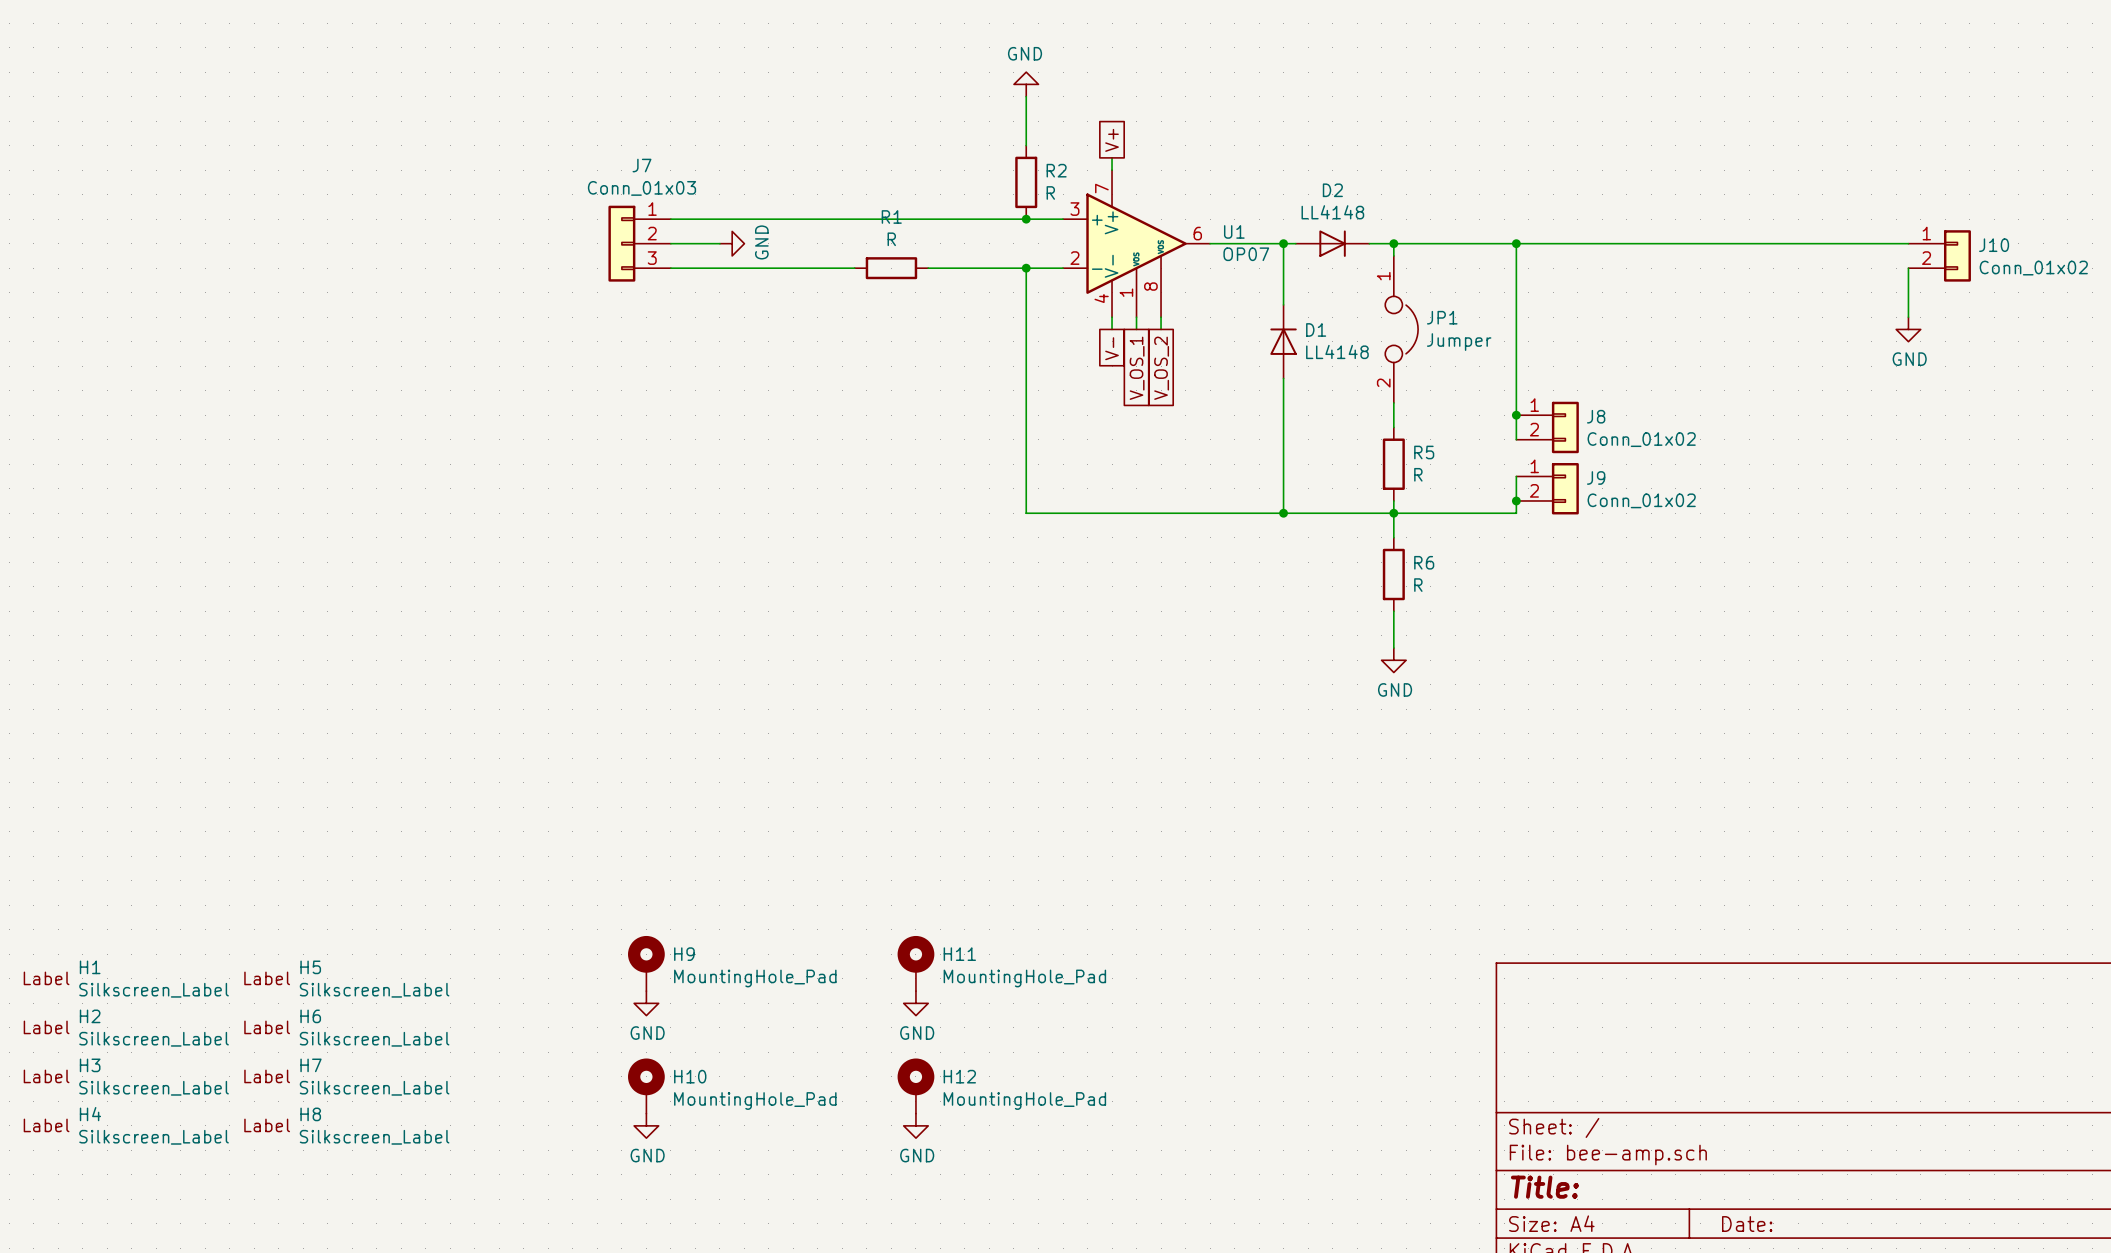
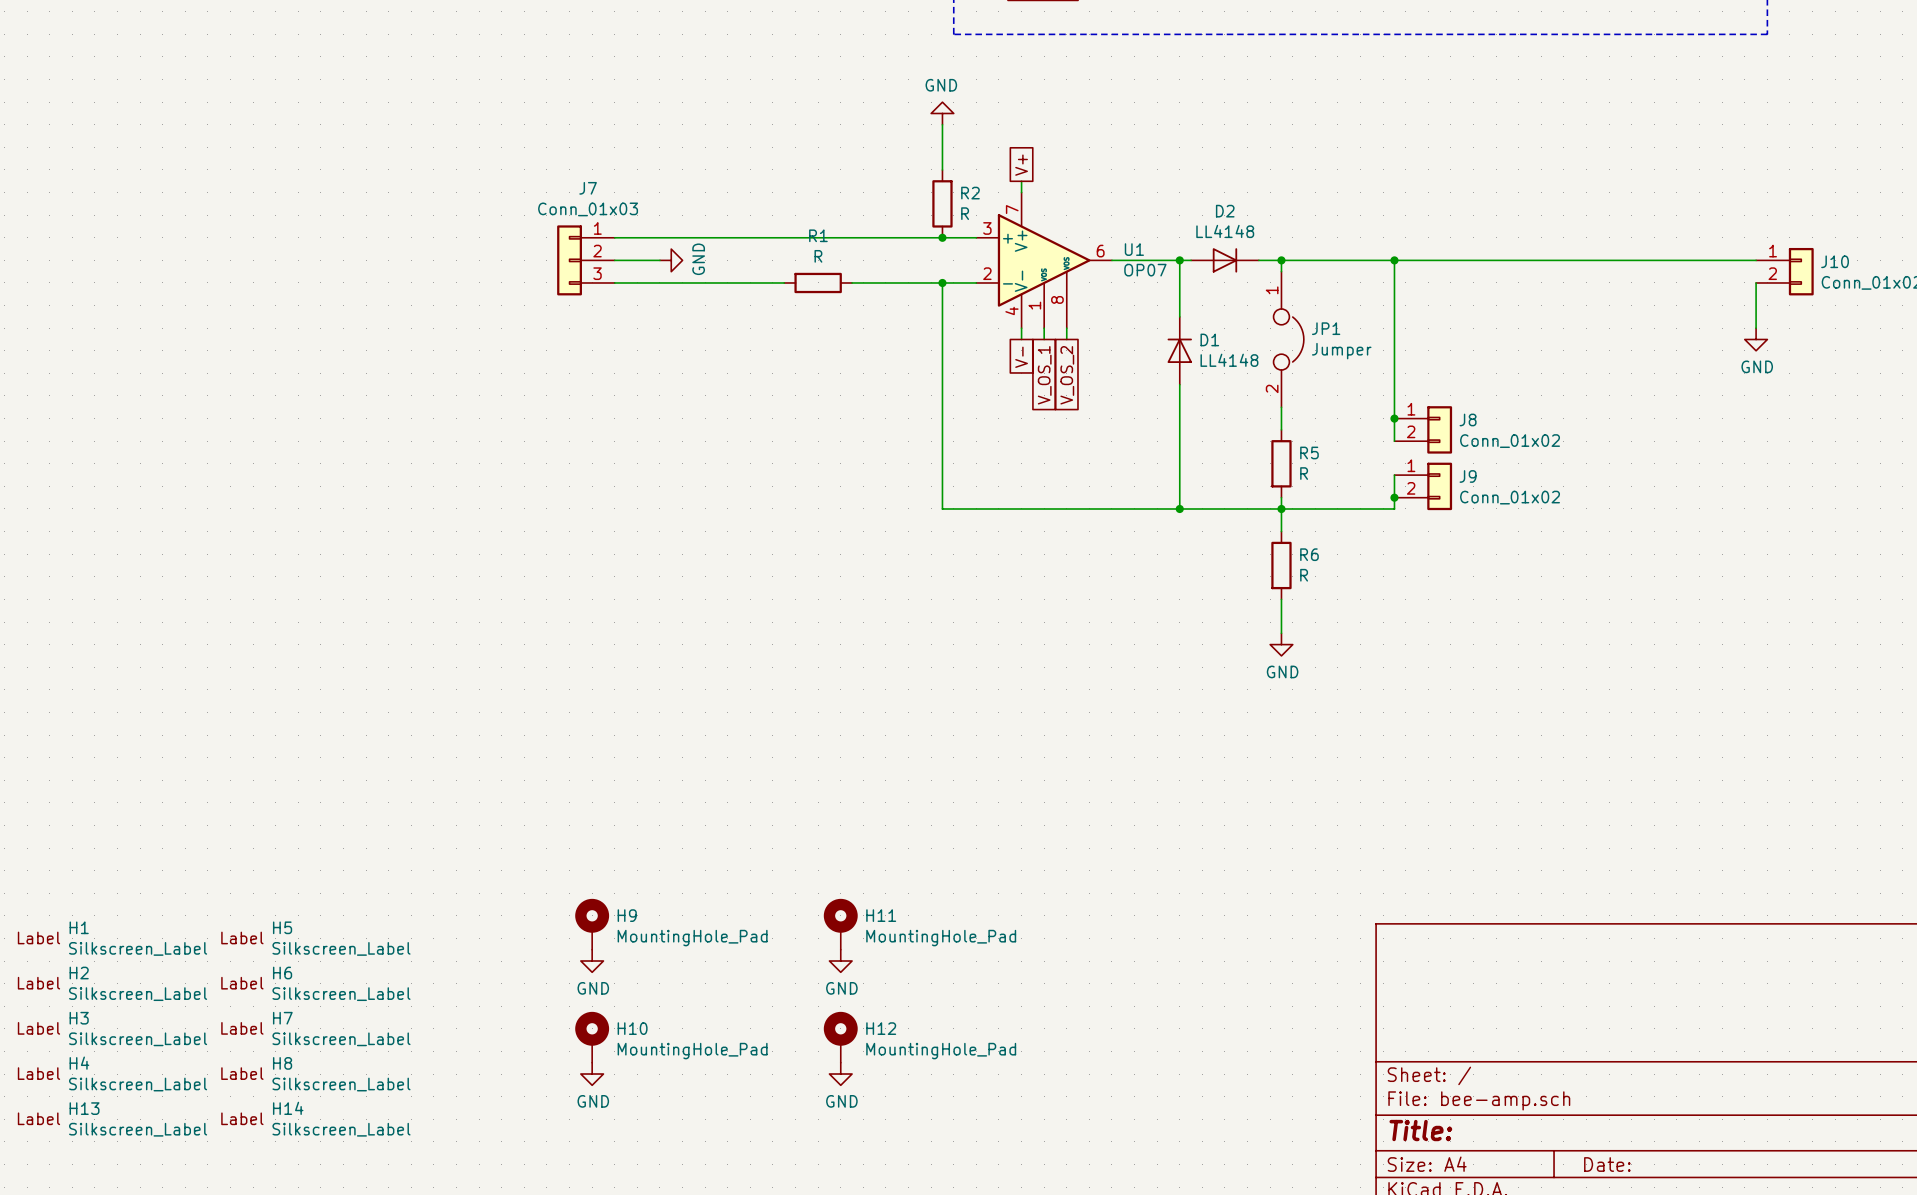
H14: none -> Silkscreen_Label (315, 1119)
H13: none -> Silkscreen_Label (112, 1119)

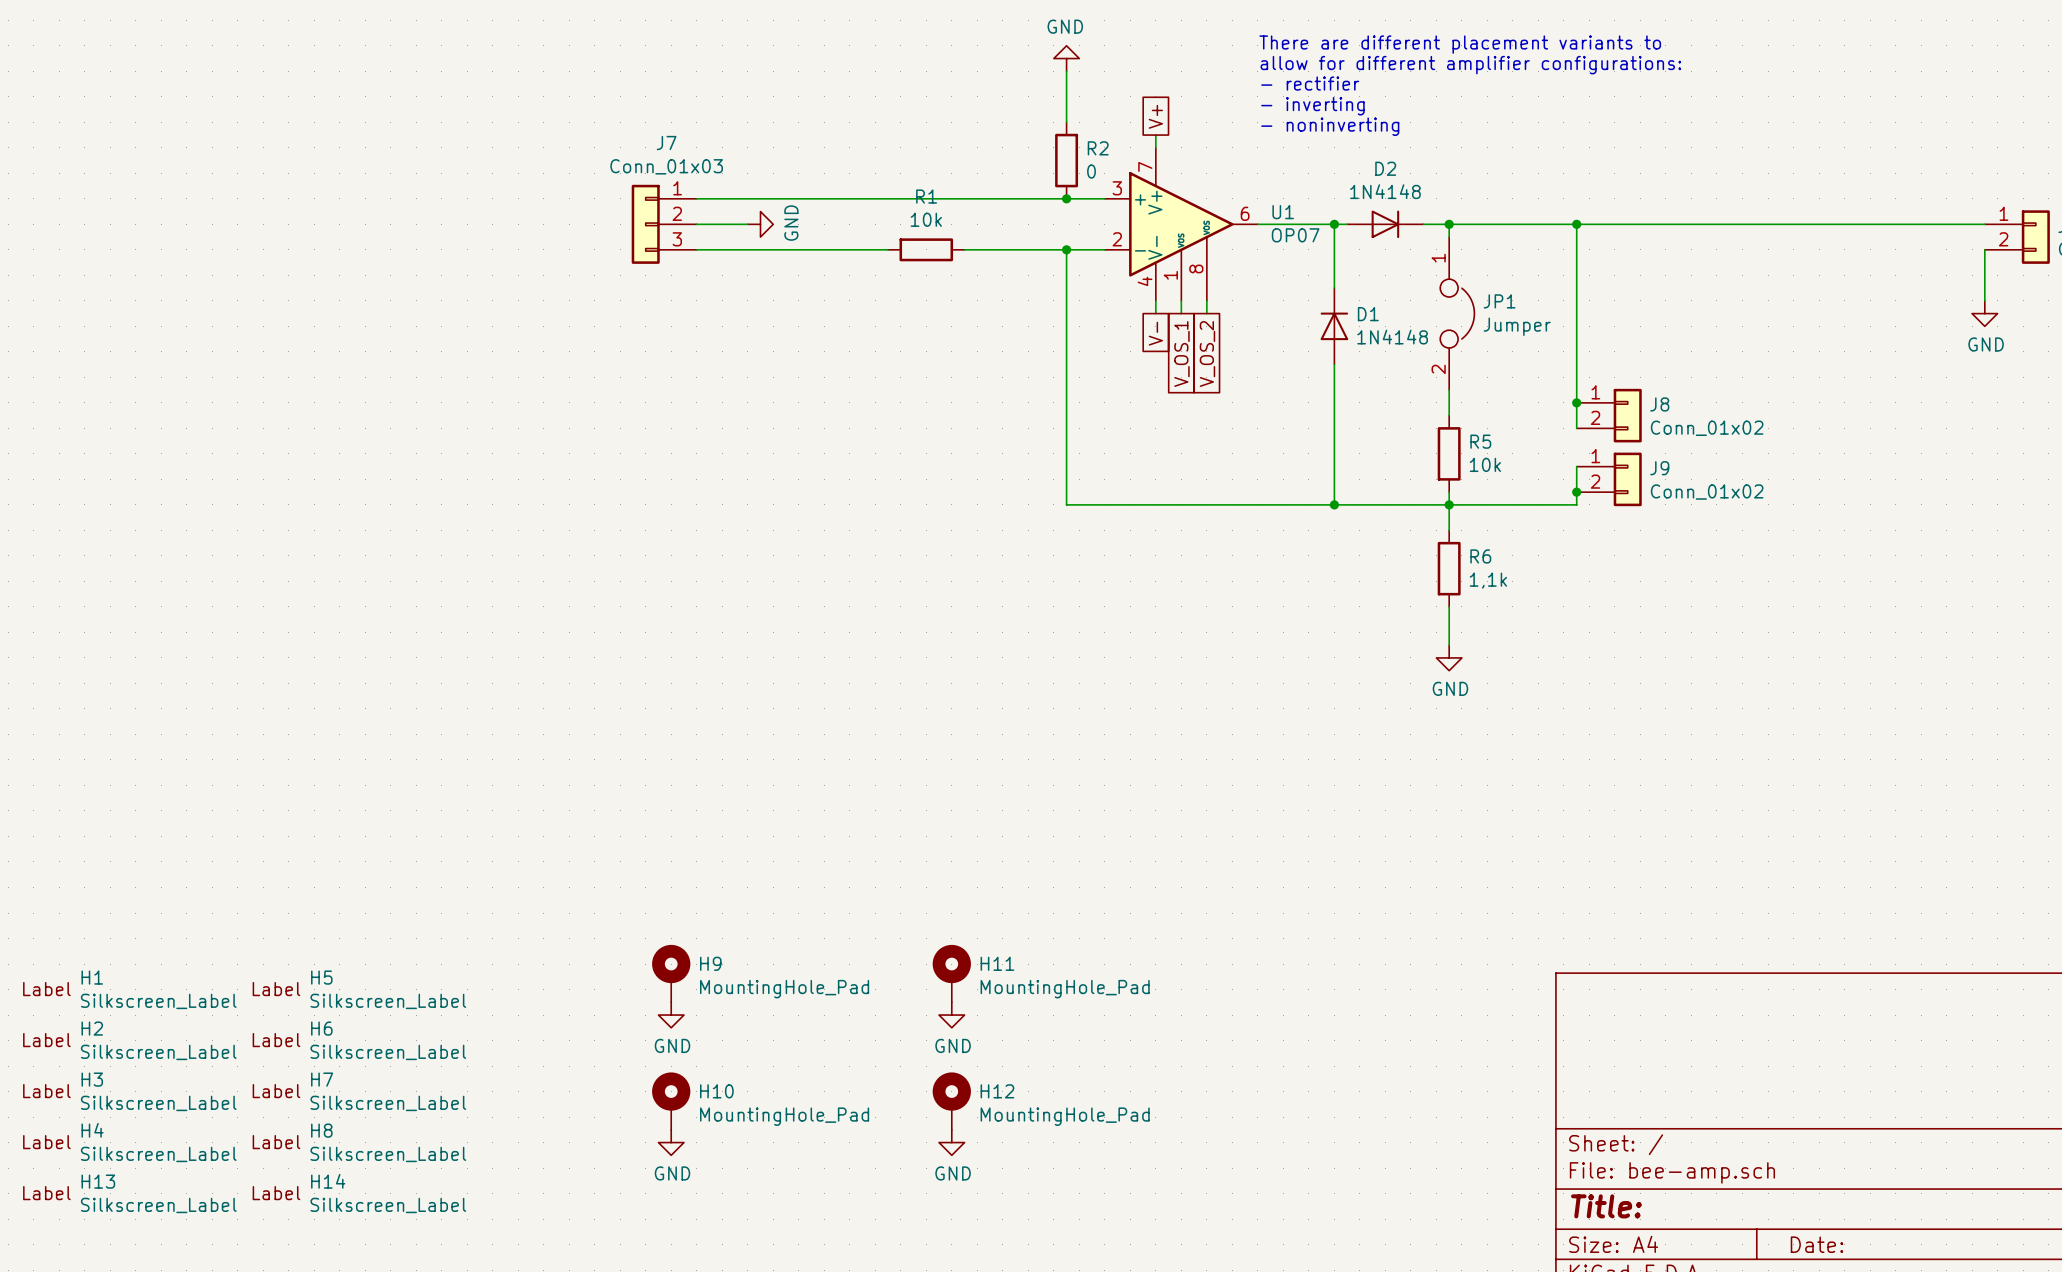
text: none -> There are different placement variants to (1460, 44)
text: none -> allow for different amplifier configurations: (1470, 65)
text: none -> - rectifier (1310, 83)
text: none -> - inverting (1312, 106)
text: none -> - noninverting (1330, 126)
R2 value: R (965, 213) -> 0 (1091, 171)
D2 value: LL4148 (1225, 231) -> 1N4148 (1385, 191)
R1 value: R (818, 256) -> 10k (926, 219)
D1 value: LL4148 (1229, 360) -> 1N4148 (1392, 337)
R5 value: R (1304, 473) -> 10k (1485, 464)
R6 value: R (1304, 575) -> 1,1k (1488, 580)

